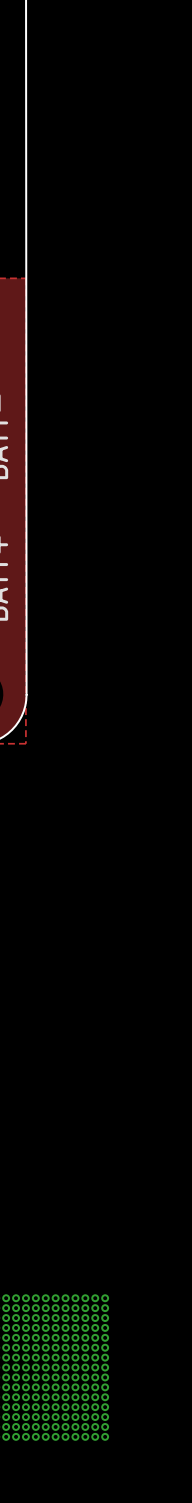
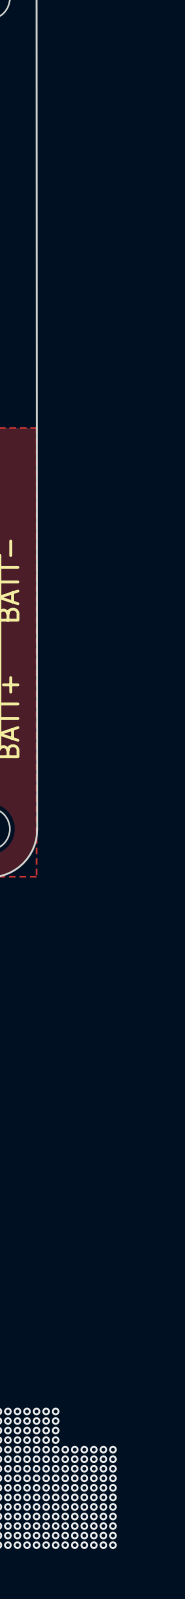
via: (55, 1298) -> none
via: (65, 1298) -> none
via: (75, 1298) -> none
via: (85, 1298) -> none
via: (95, 1298) -> none
via: (105, 1298) -> none
via: (55, 1308) -> none
via: (65, 1308) -> none
via: (75, 1308) -> none
via: (85, 1308) -> none
via: (95, 1308) -> none
via: (105, 1308) -> none
via: (55, 1318) -> none
via: (65, 1318) -> none
via: (75, 1318) -> none
via: (85, 1318) -> none
via: (95, 1318) -> none
via: (105, 1318) -> none
via: (55, 1327) -> none
via: (65, 1327) -> none
via: (75, 1327) -> none
via: (85, 1327) -> none
via: (95, 1327) -> none
via: (105, 1327) -> none

